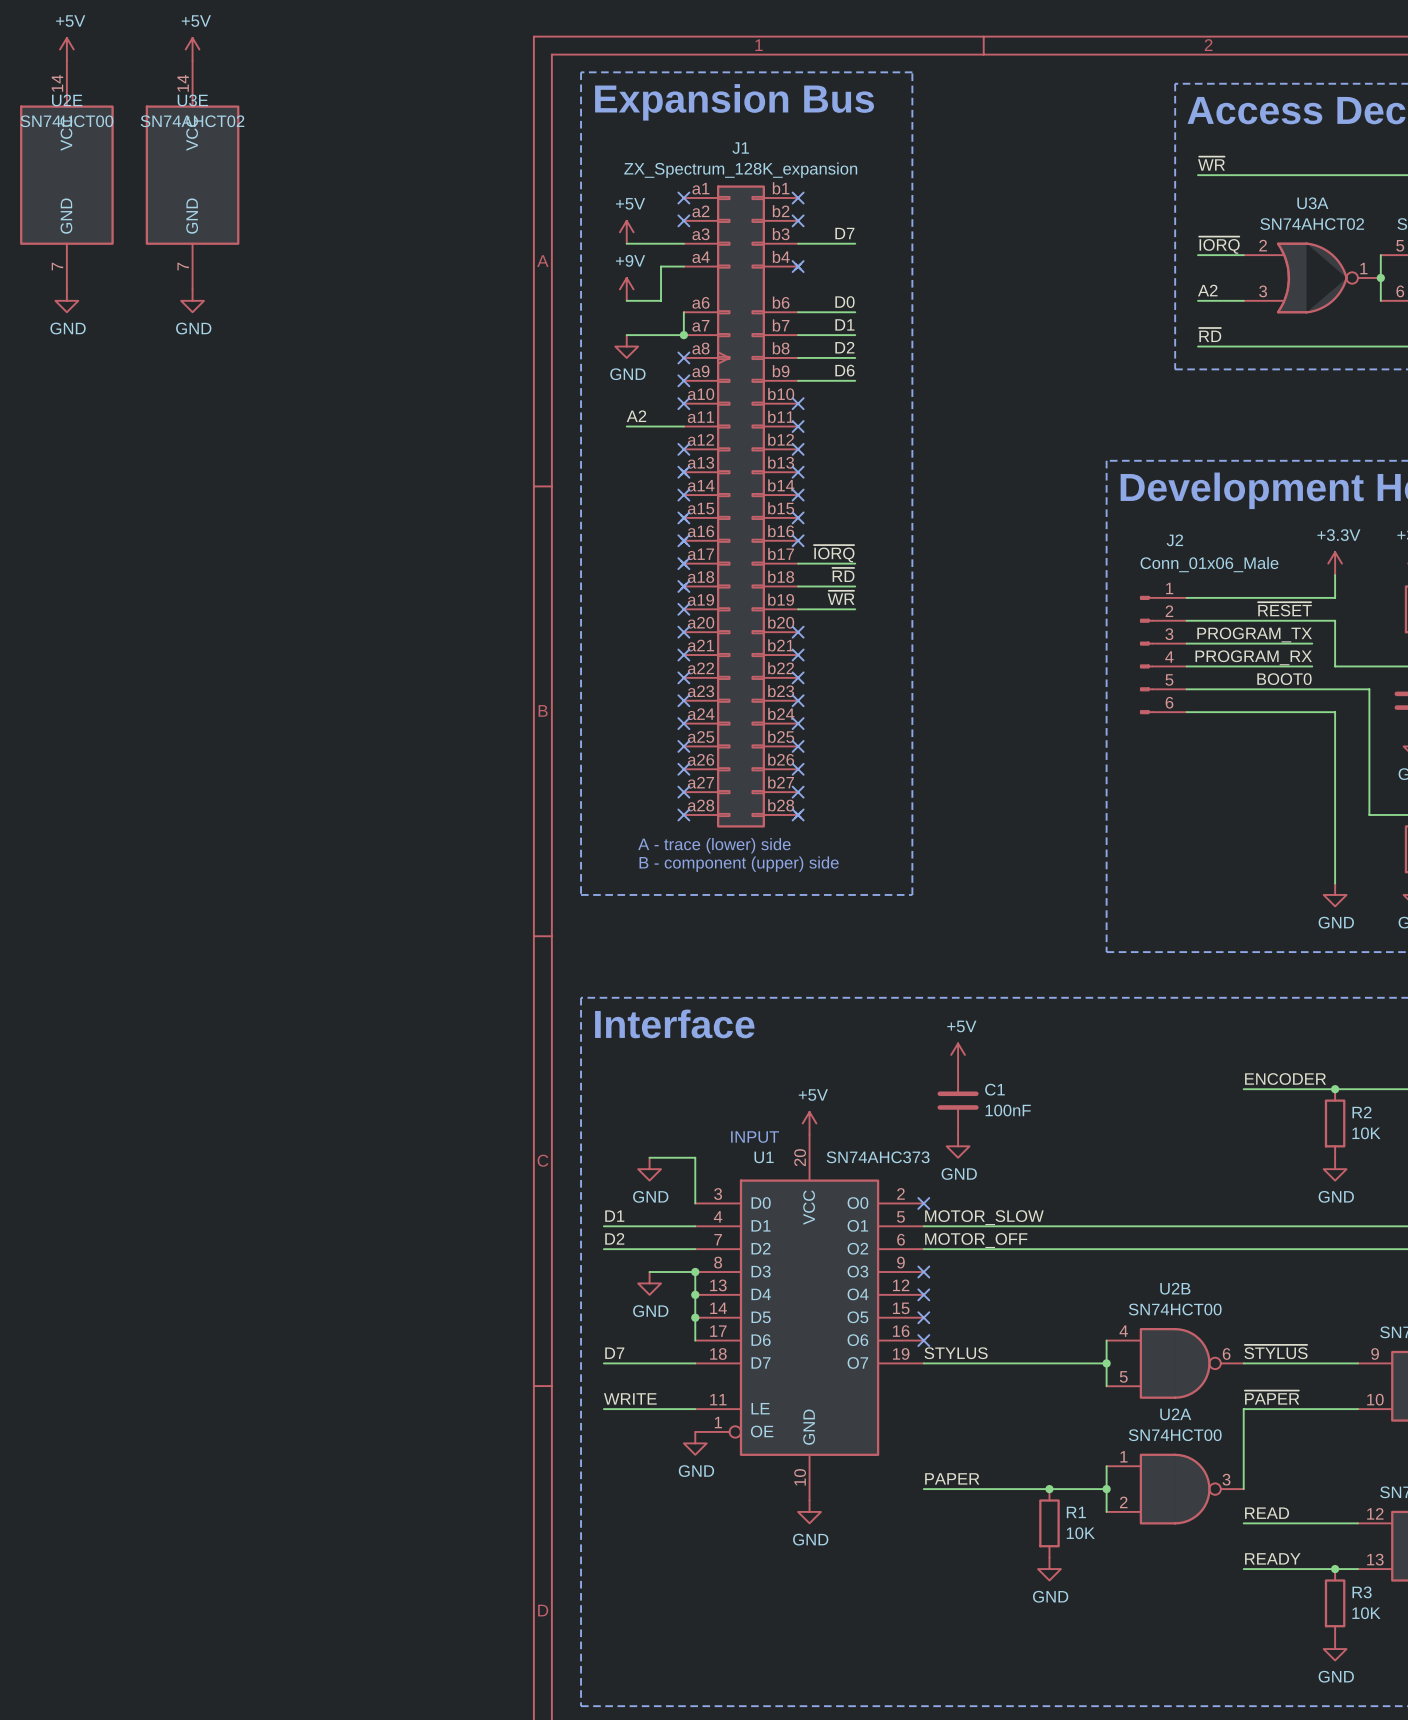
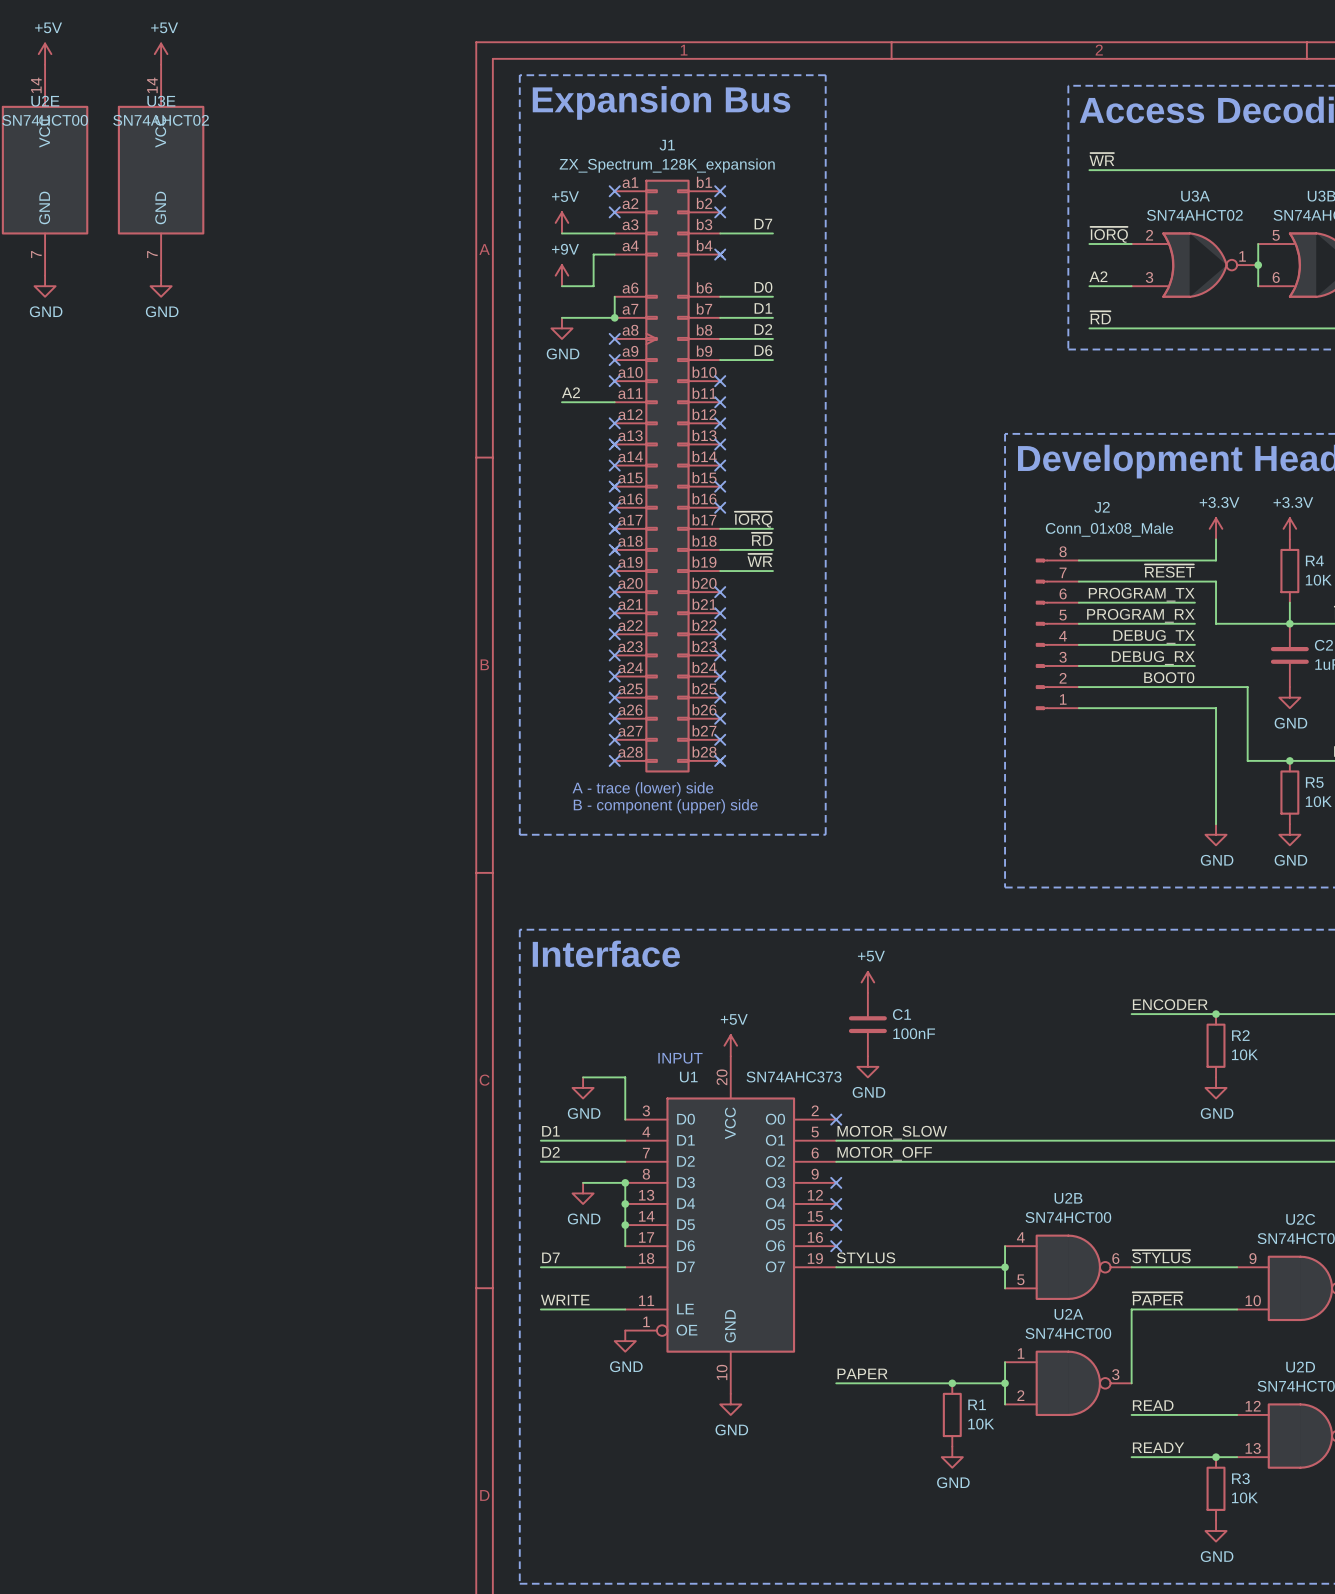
J2 name position: J2 (1174, 540) -> J2 (1102, 507)
J2 value: Conn_01x06_Male (1209, 564) -> Conn_01x08_Male (1109, 529)
J2 symbol: [1140, 596, 1187, 714] -> [1036, 558, 1079, 710]
label: BOOT0 (1284, 679) -> DEBUG_TX (1154, 636)
wire: (1312, 689) (1369, 689) (1369, 735) -> (1078, 687) (1247, 687)
label: none -> DEBUG_RX (1153, 658)
wire: (1312, 712) (1335, 712) (1335, 757) -> (1078, 708) (1216, 708)
label: none -> BOOT0 (1169, 677)

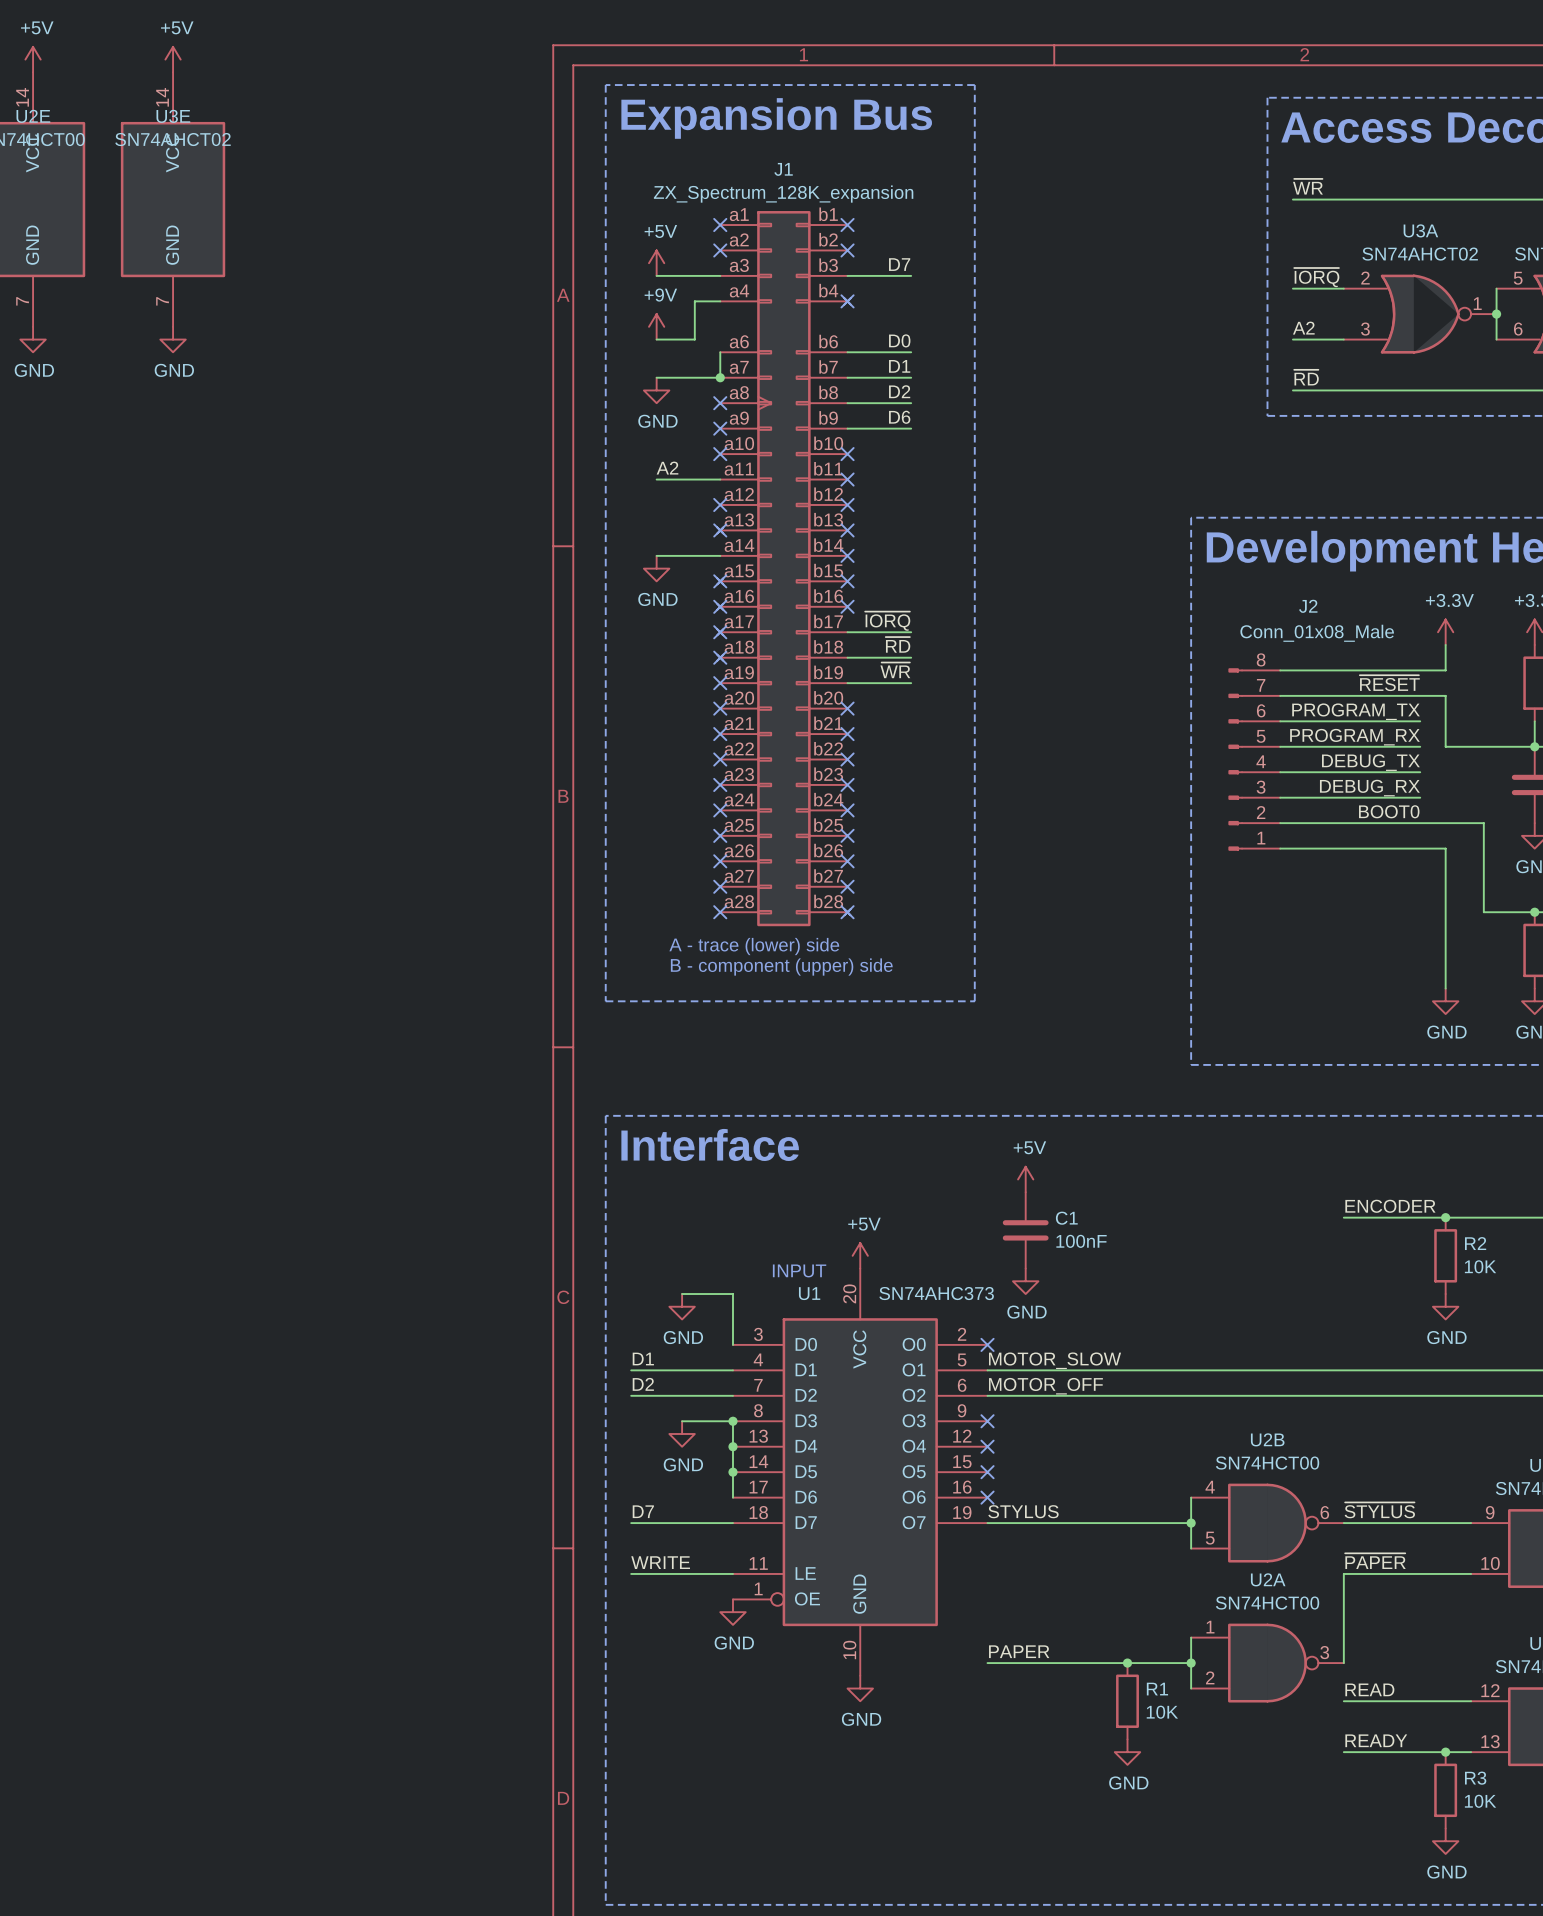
wire: none -> (656, 555) (720, 555)
no-connect mark: (614, 465) -> none
power symbol: none -> GND (656, 568)

